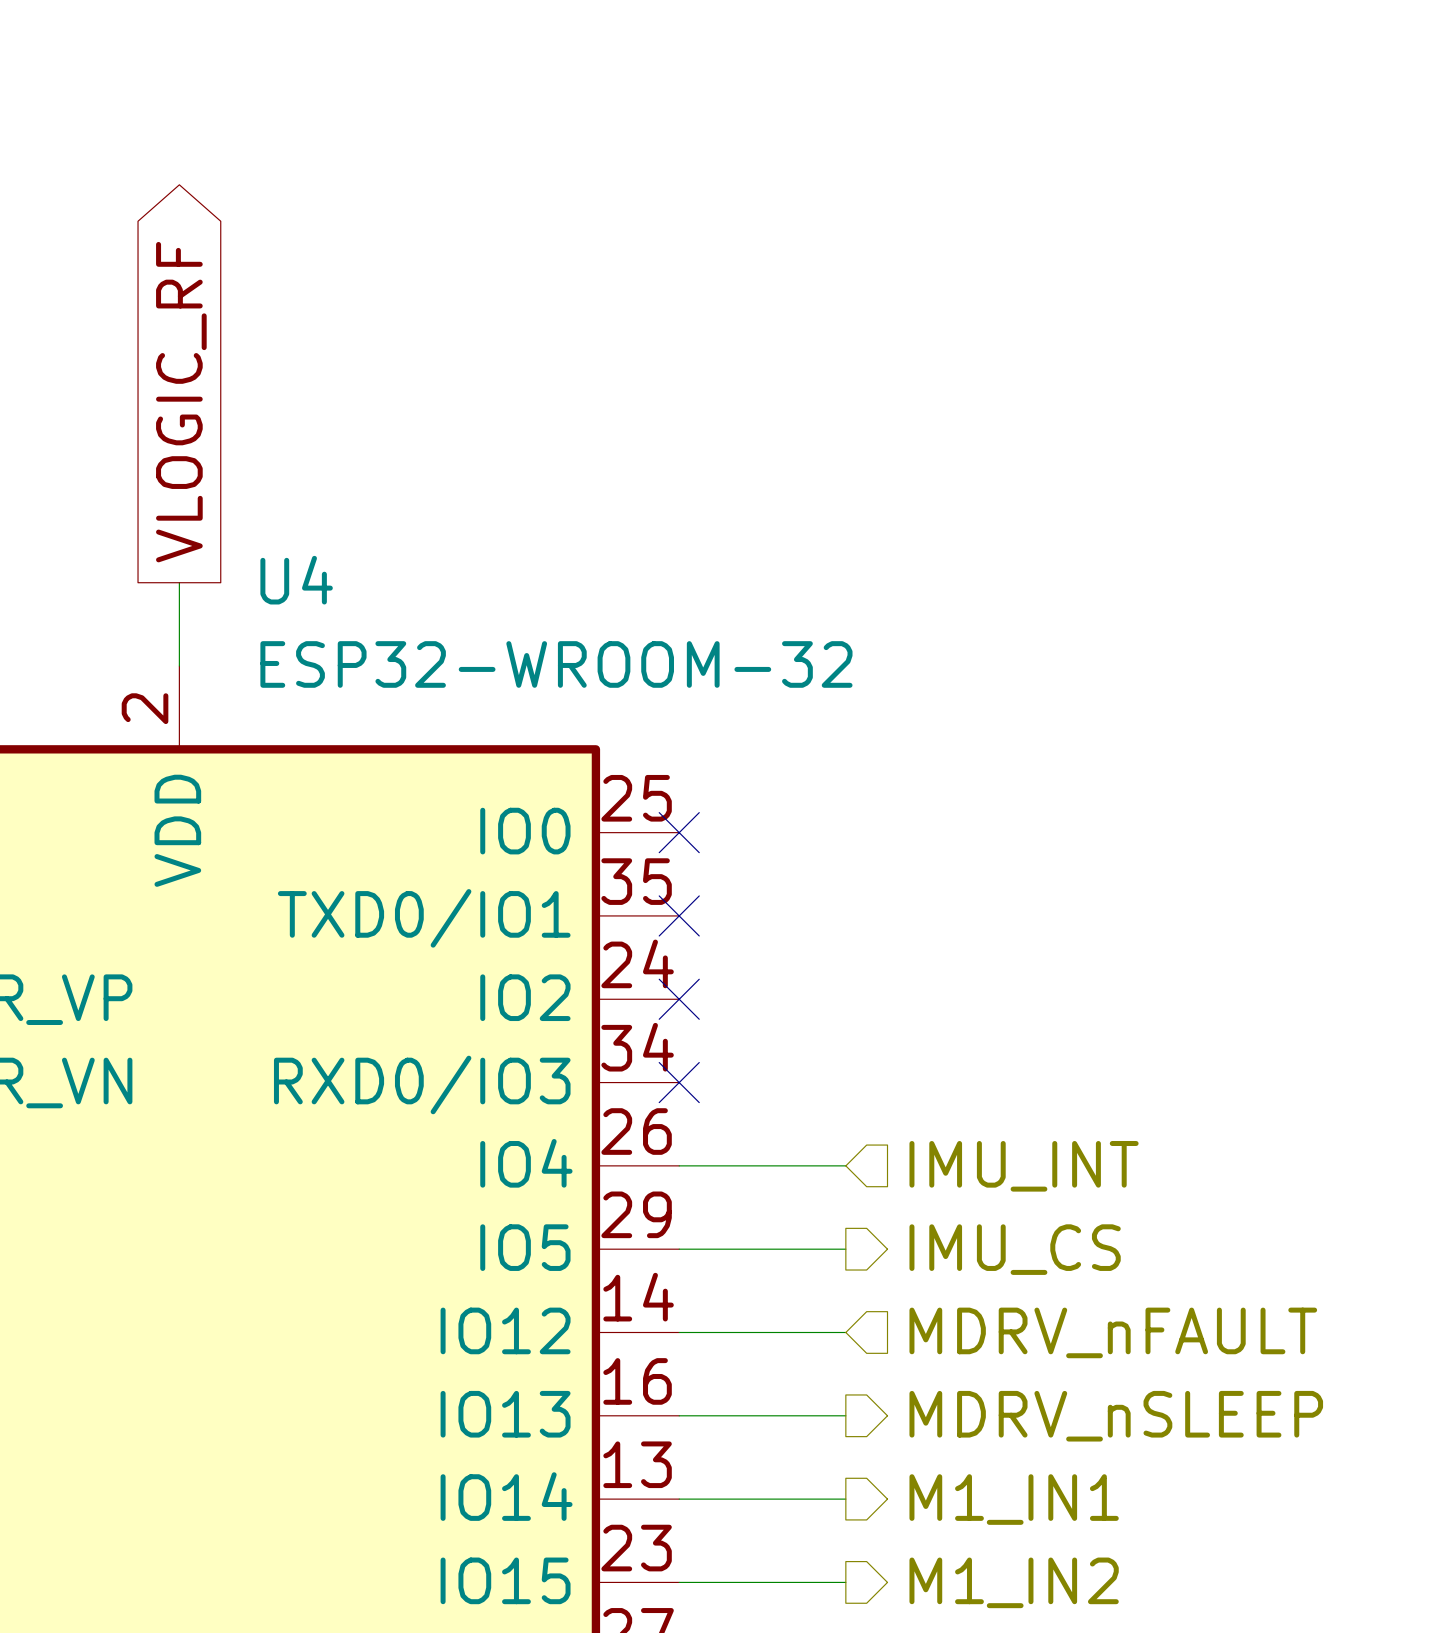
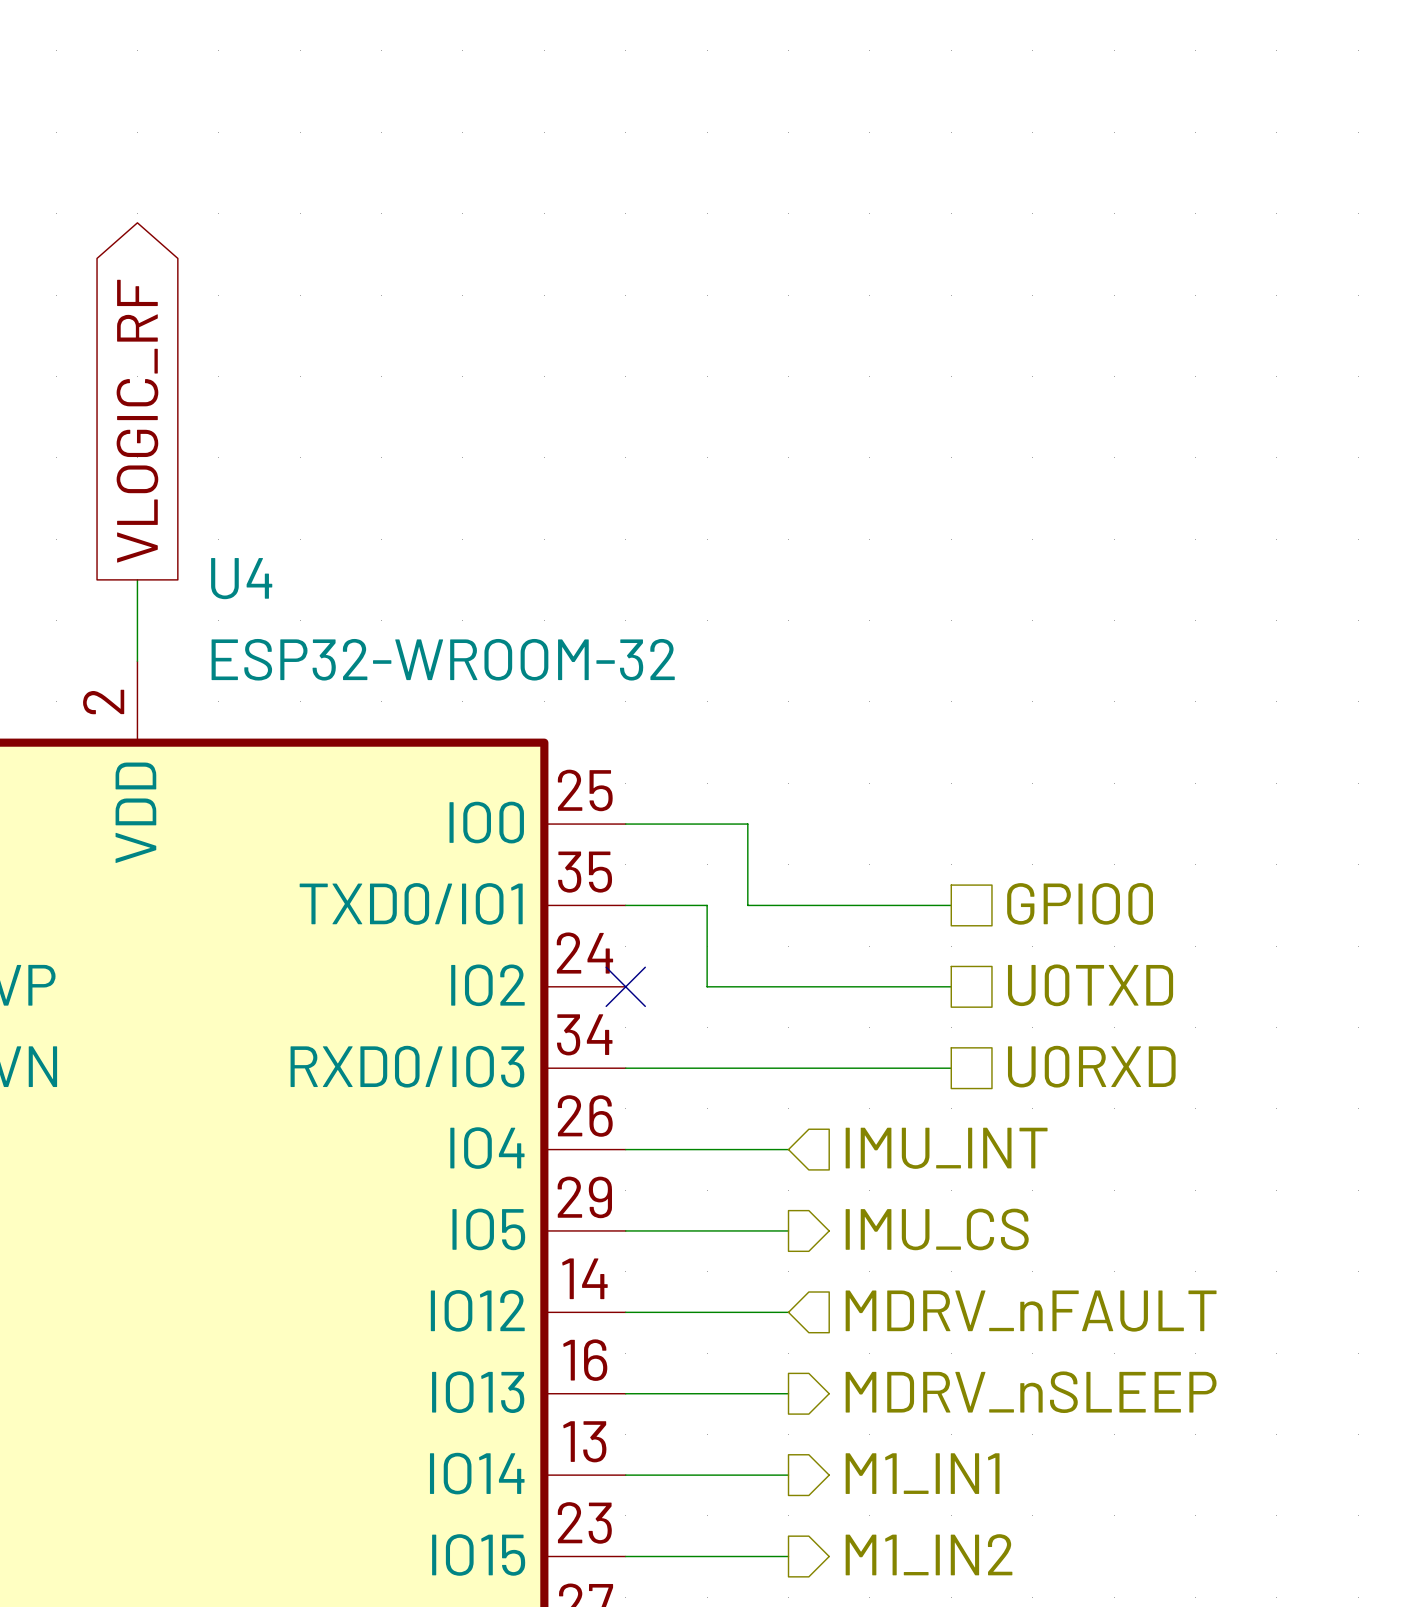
wire: none -> (625, 824) (747, 824) (747, 905) (951, 905)
no-connect mark: (679, 832) -> none
hierarchical label: none -> GPIO0 (1080, 903)
wire: none -> (625, 905) (707, 905) (707, 986) (951, 986)
no-connect mark: (679, 915) -> none
hierarchical label: none -> U0TXD (1090, 985)
hierarchical label: none -> U0RXD (1091, 1066)
wire: none -> (625, 1068) (951, 1068)
no-connect mark: (679, 1082) -> none

